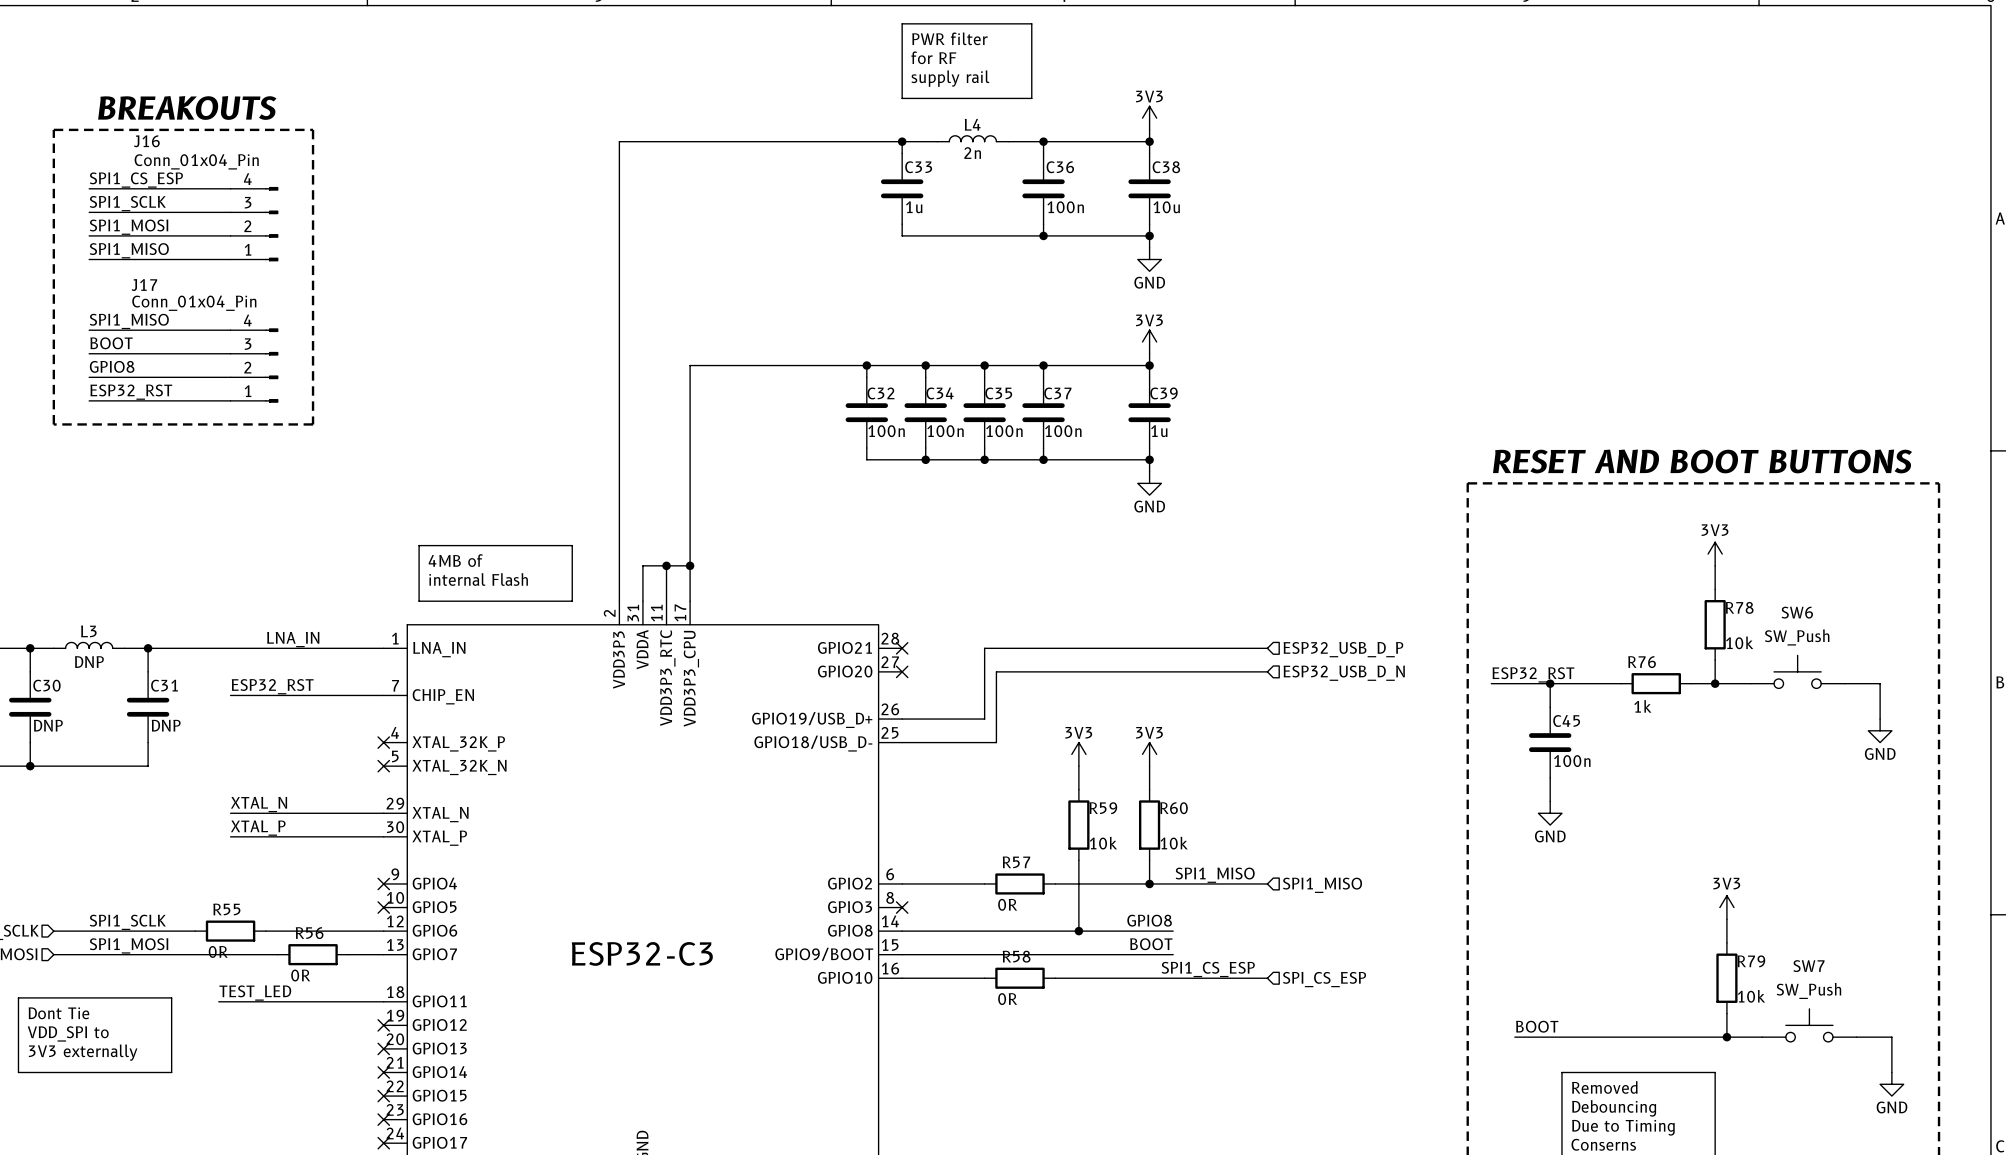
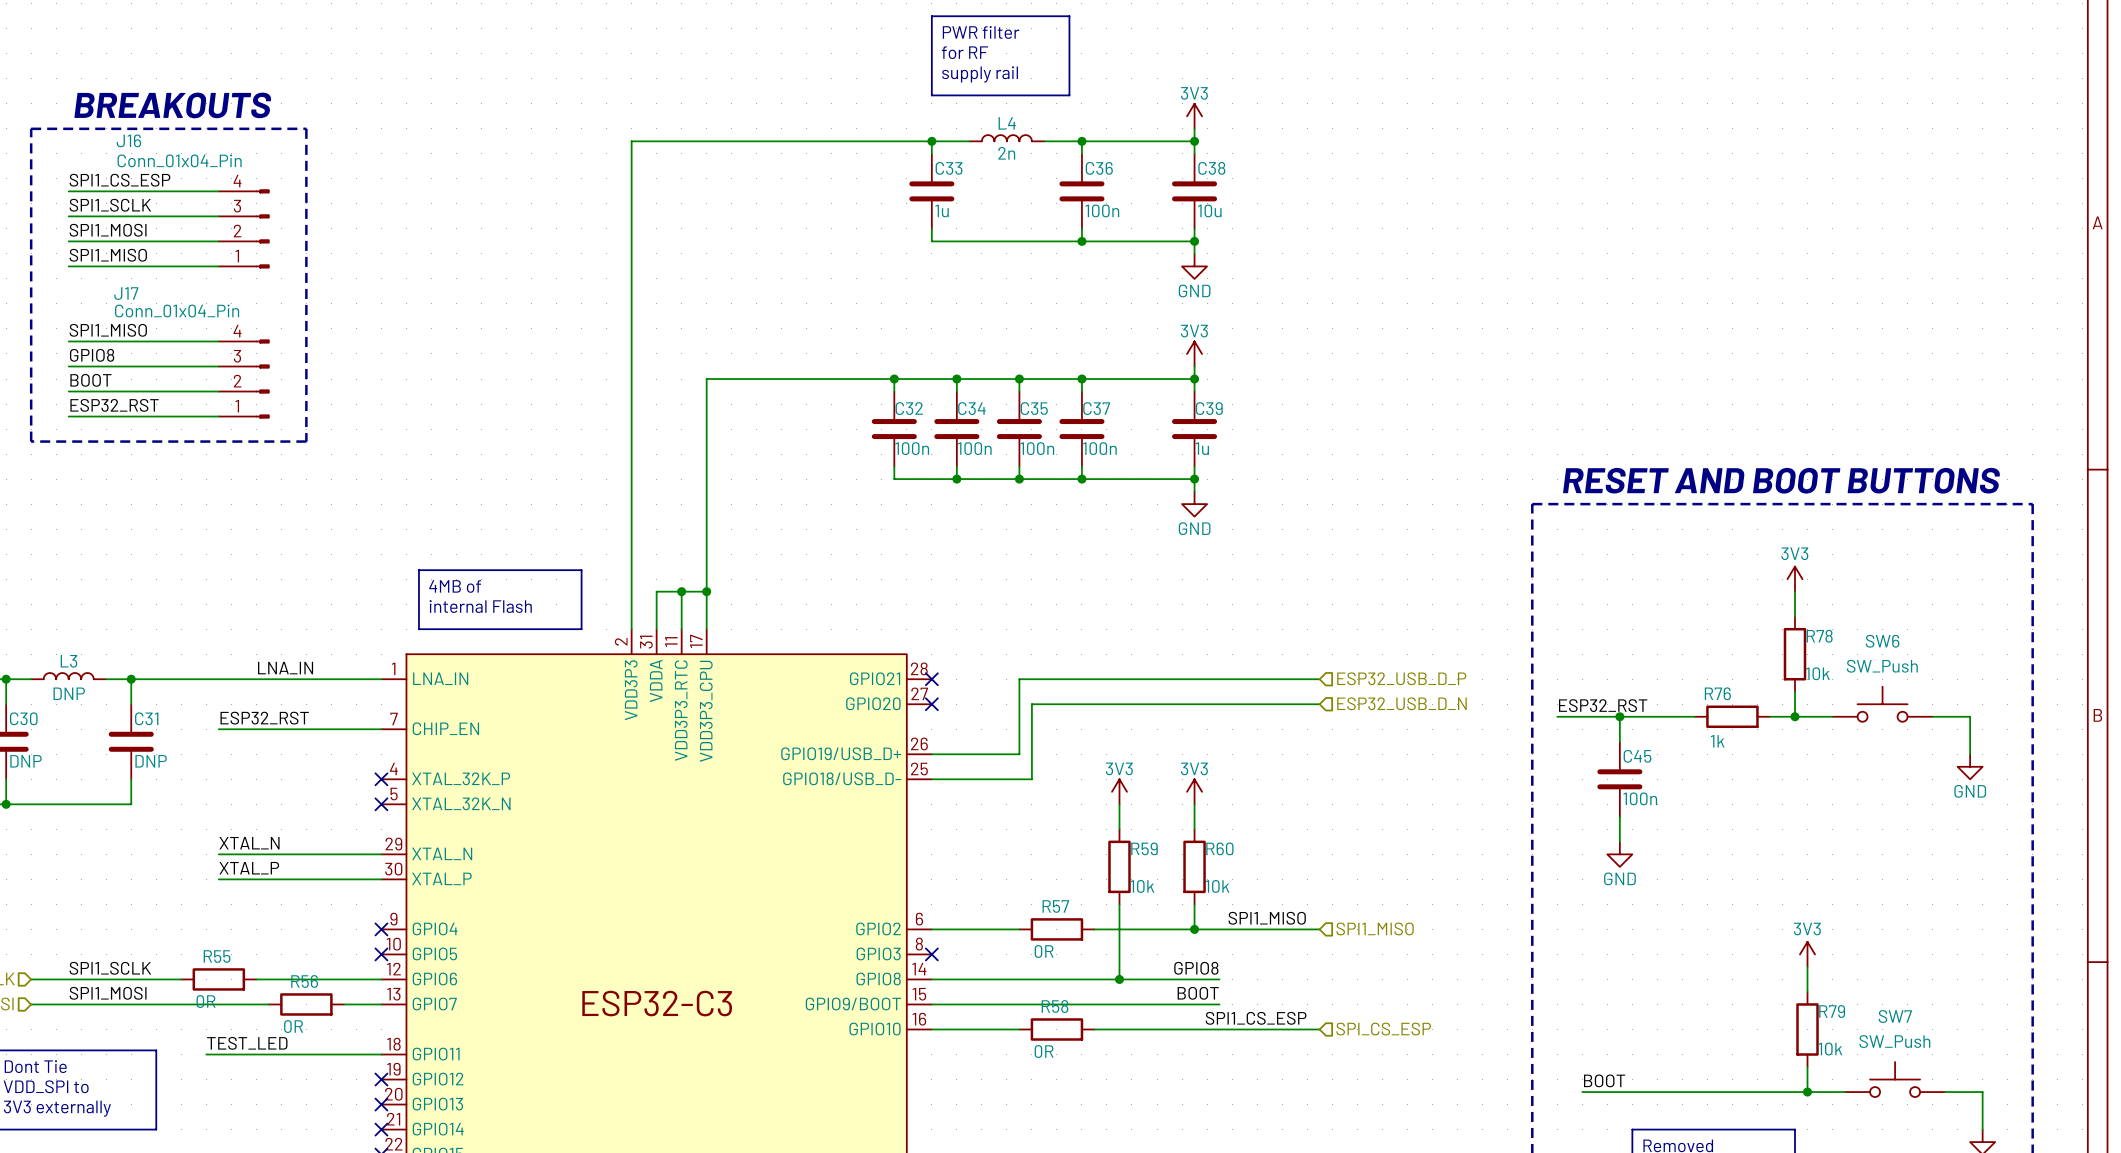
label: BOOT (111, 343) -> GPIO8 (92, 355)
label: GPIO8 (112, 366) -> BOOT (90, 380)

